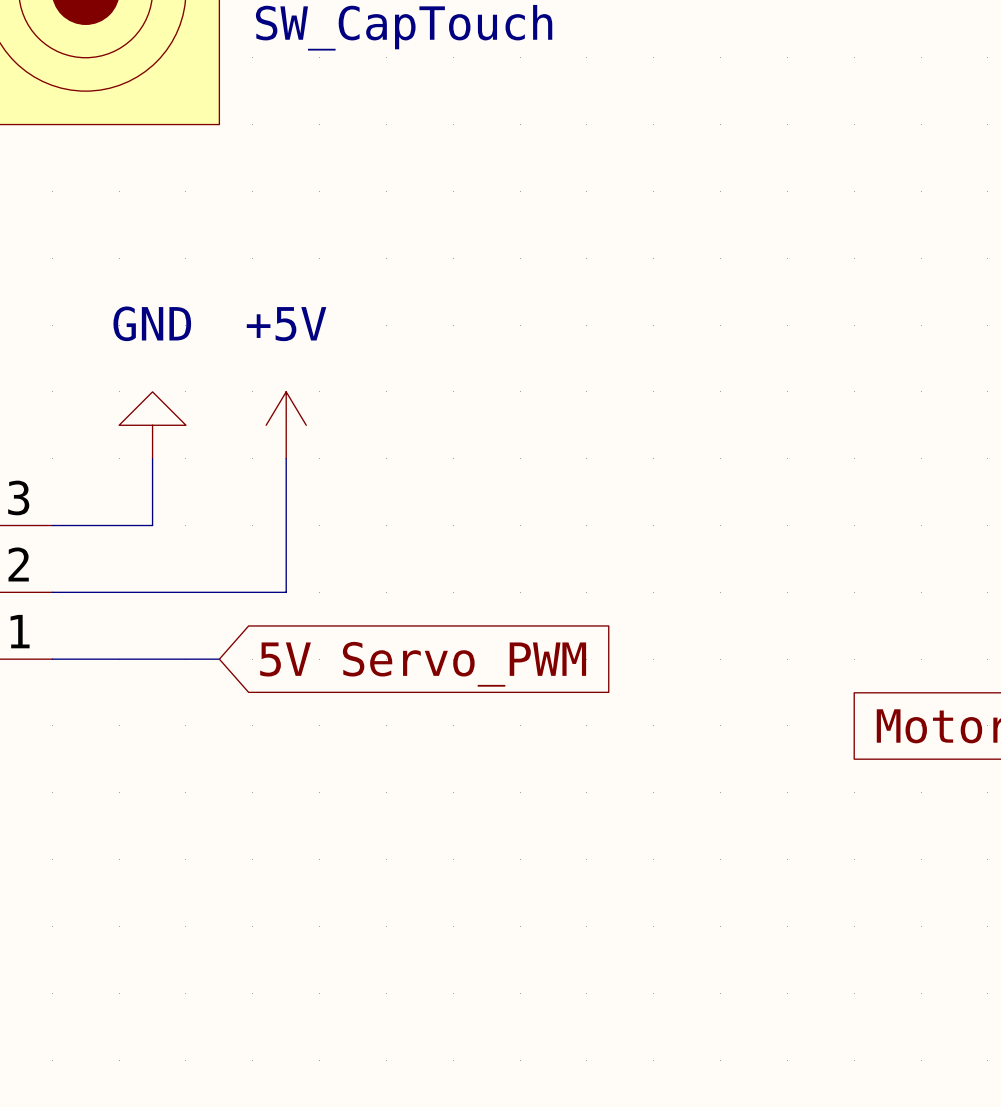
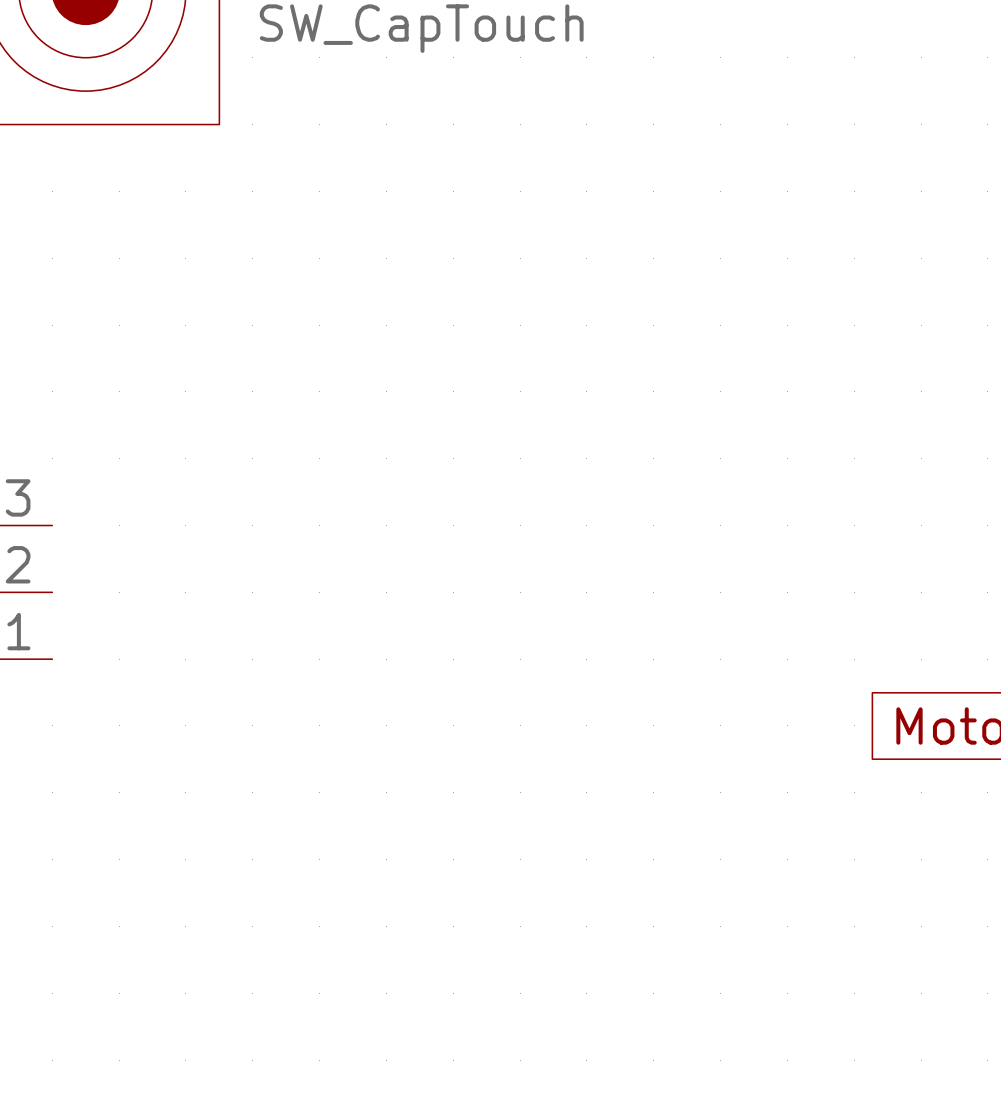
power symbol: GND (152, 425) -> none
power symbol: +5V (286, 425) -> none
wire: (152, 458) (152, 525) (52, 525) -> none
wire: (286, 458) (286, 592) (52, 592) -> none
wire: (52, 659) (219, 659) -> none
global label: 5V Servo_PWM (423, 664) -> none

